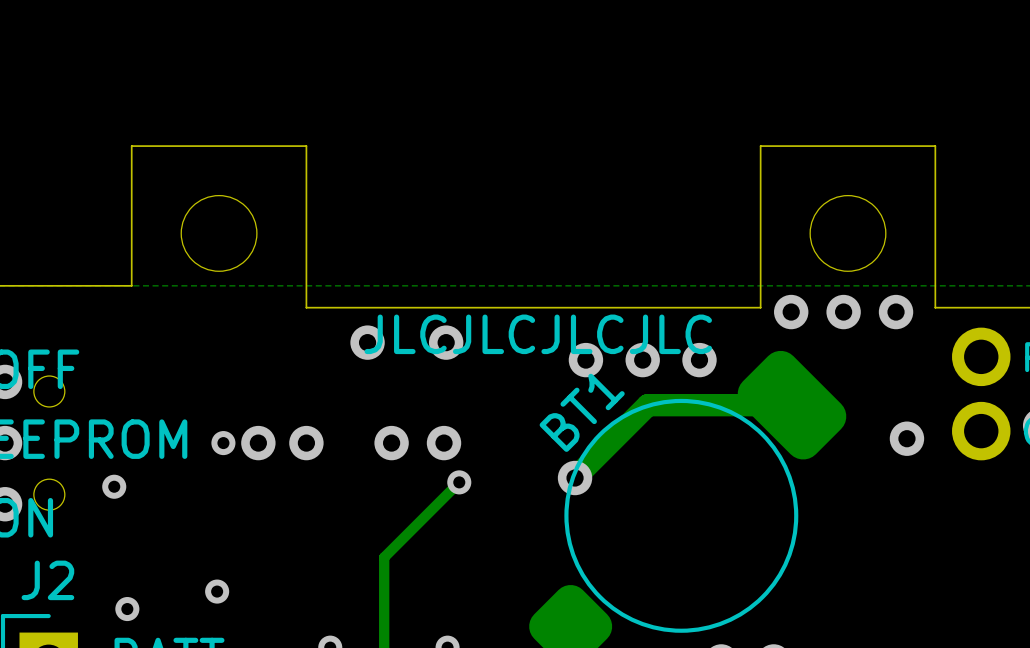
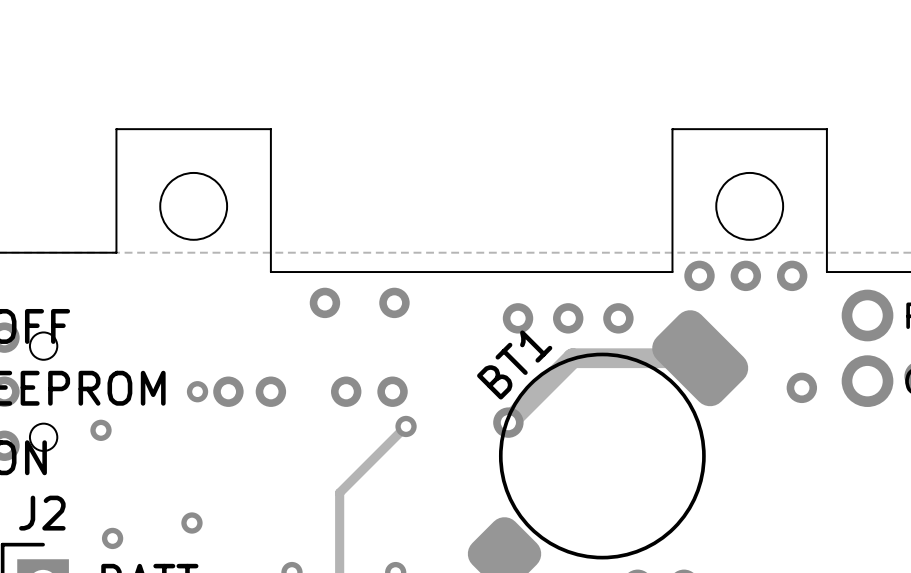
text: JLCJLCJLCJLC (538, 334) -> none

